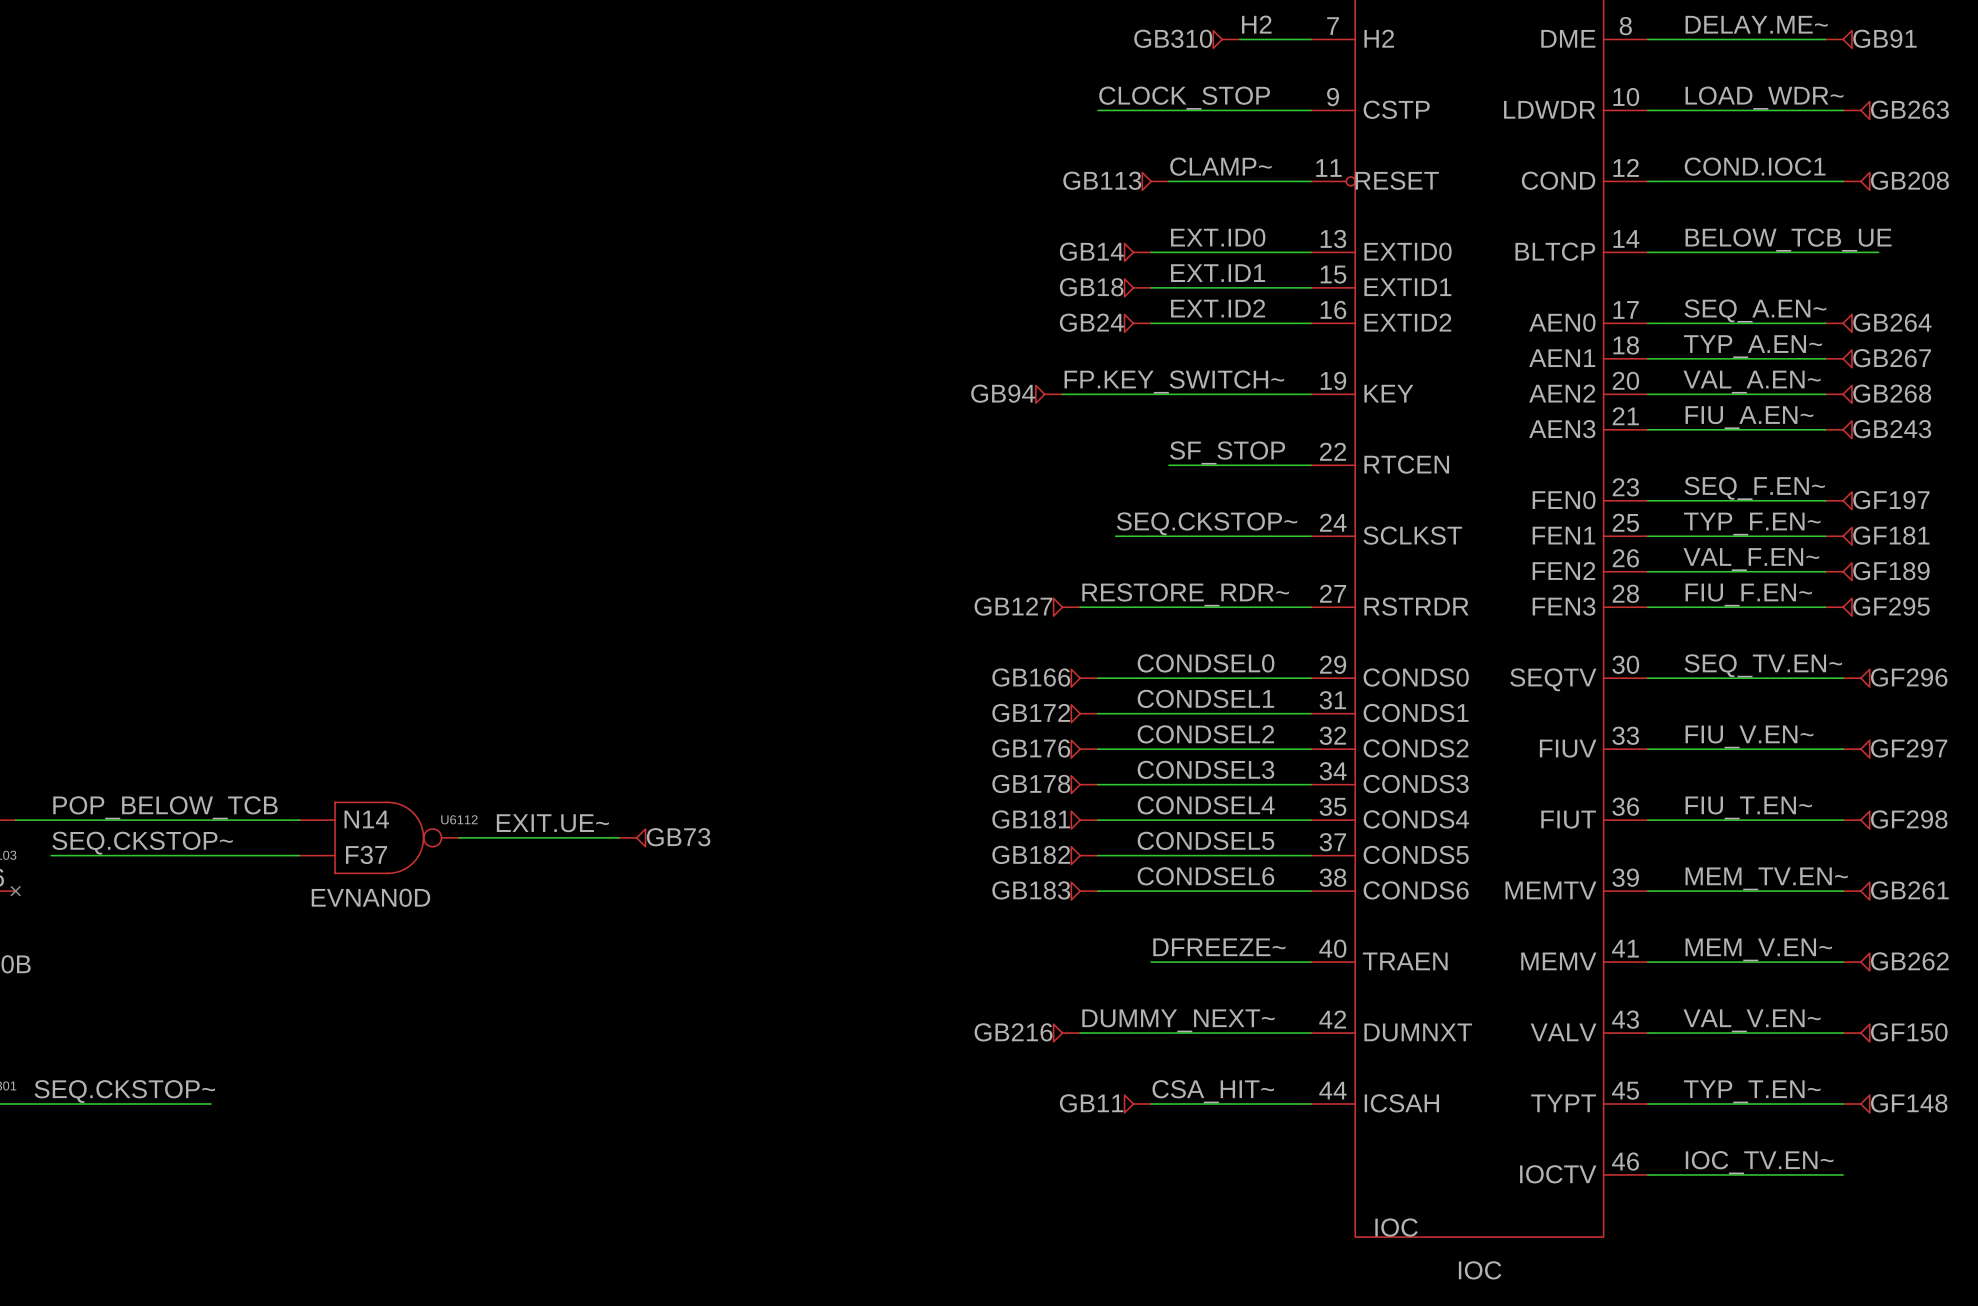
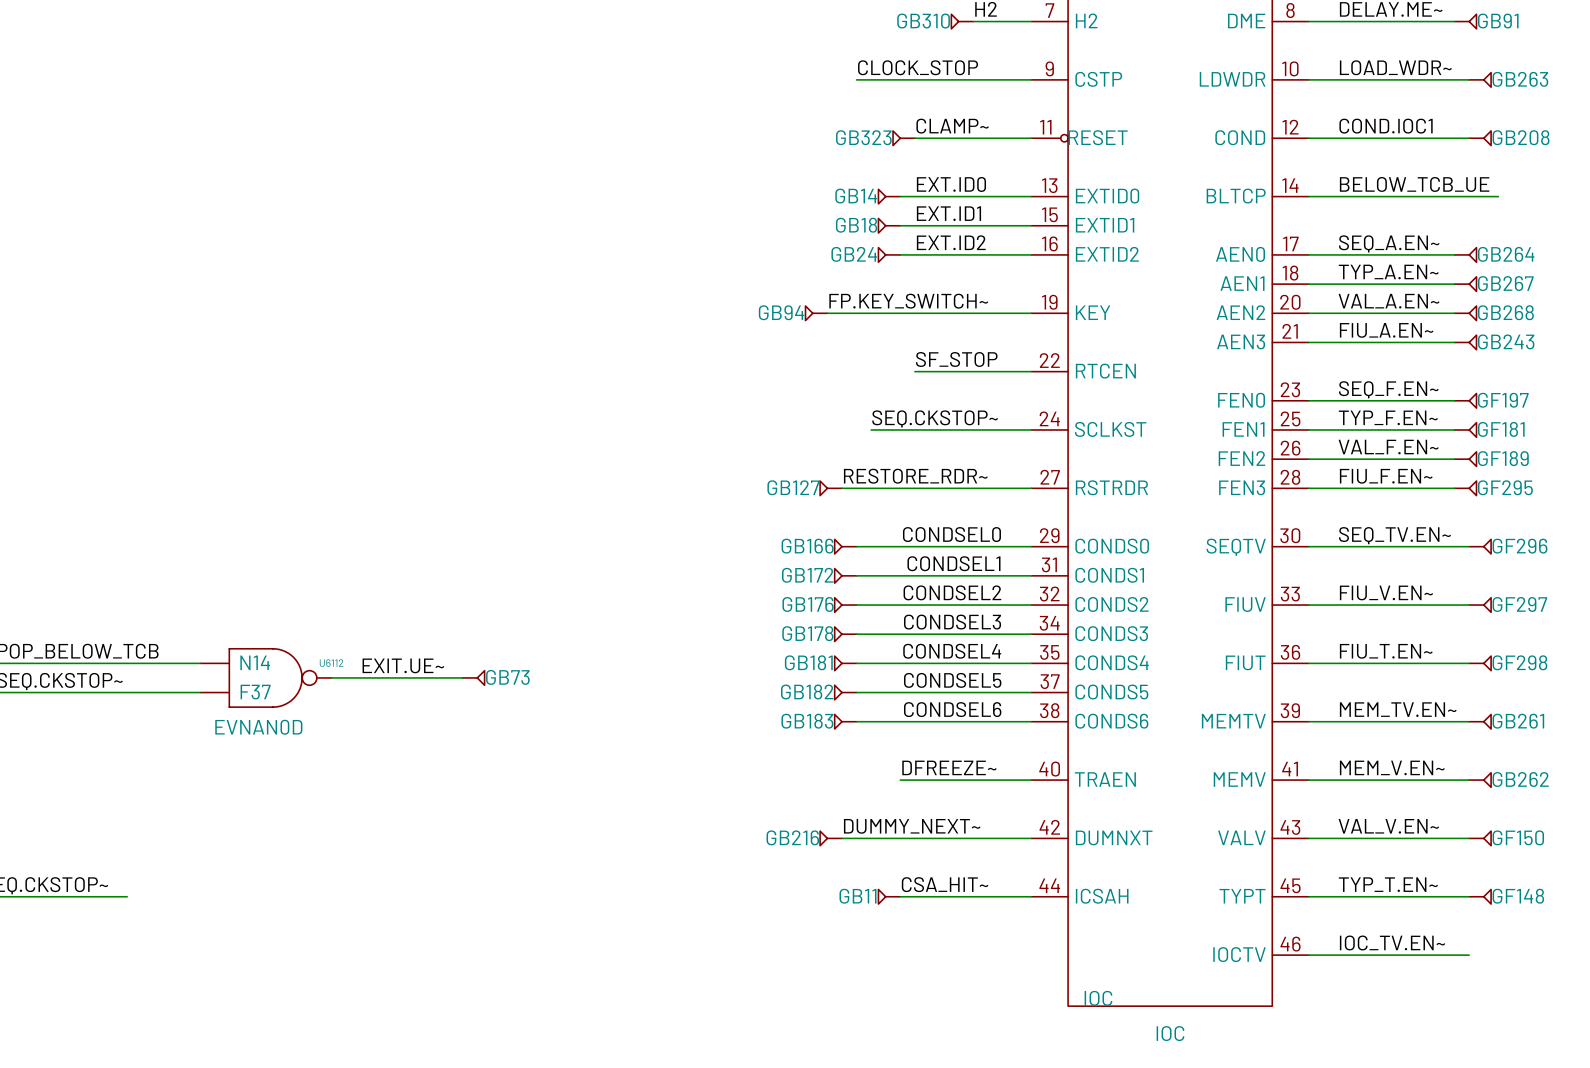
GB113 name: GB113 (1102, 180) -> GB323 (863, 137)

